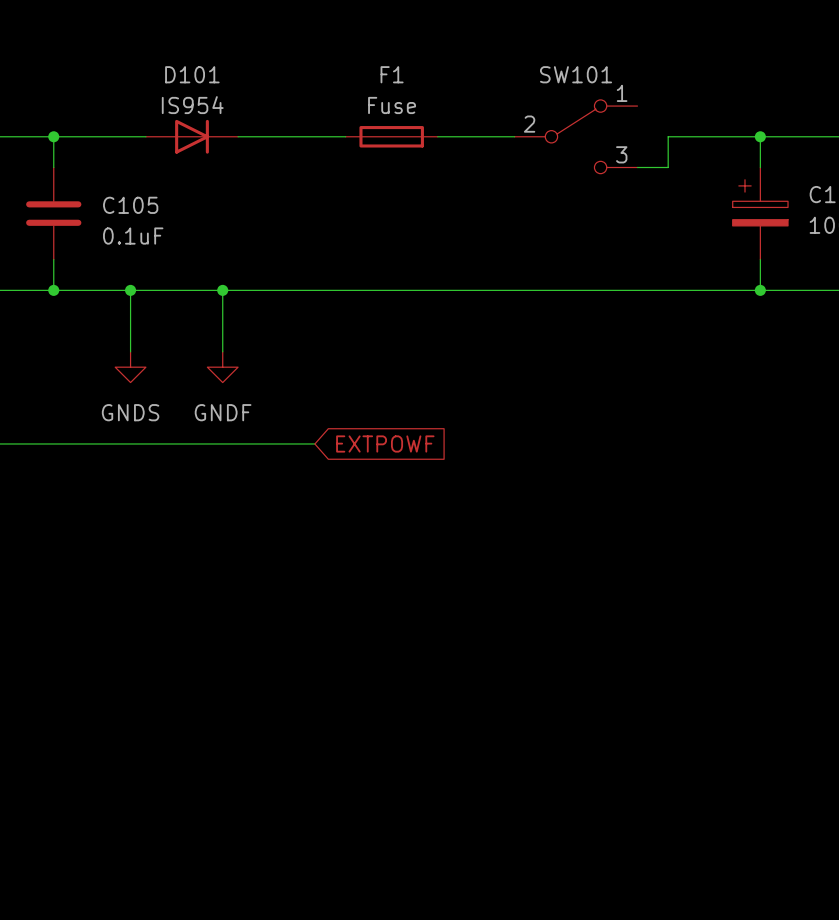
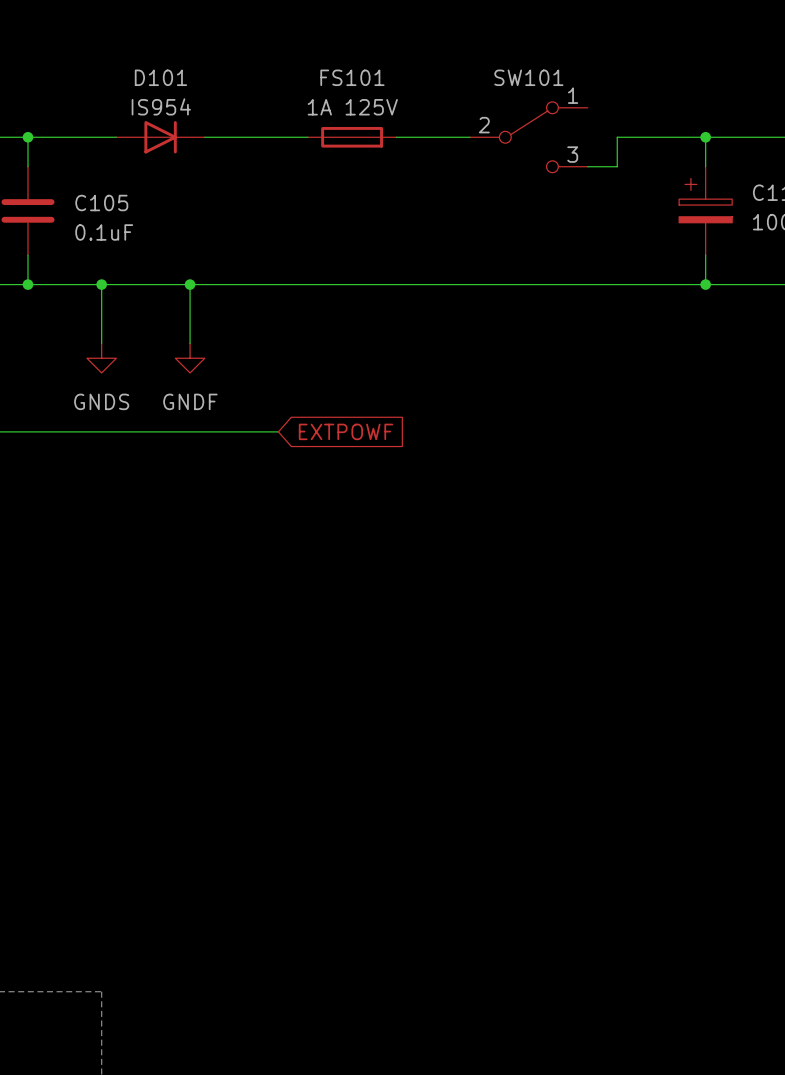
F1 name: F1 (392, 74) -> FS101 (352, 77)
F1 value: Fuse (392, 105) -> 1A 125V (352, 107)

